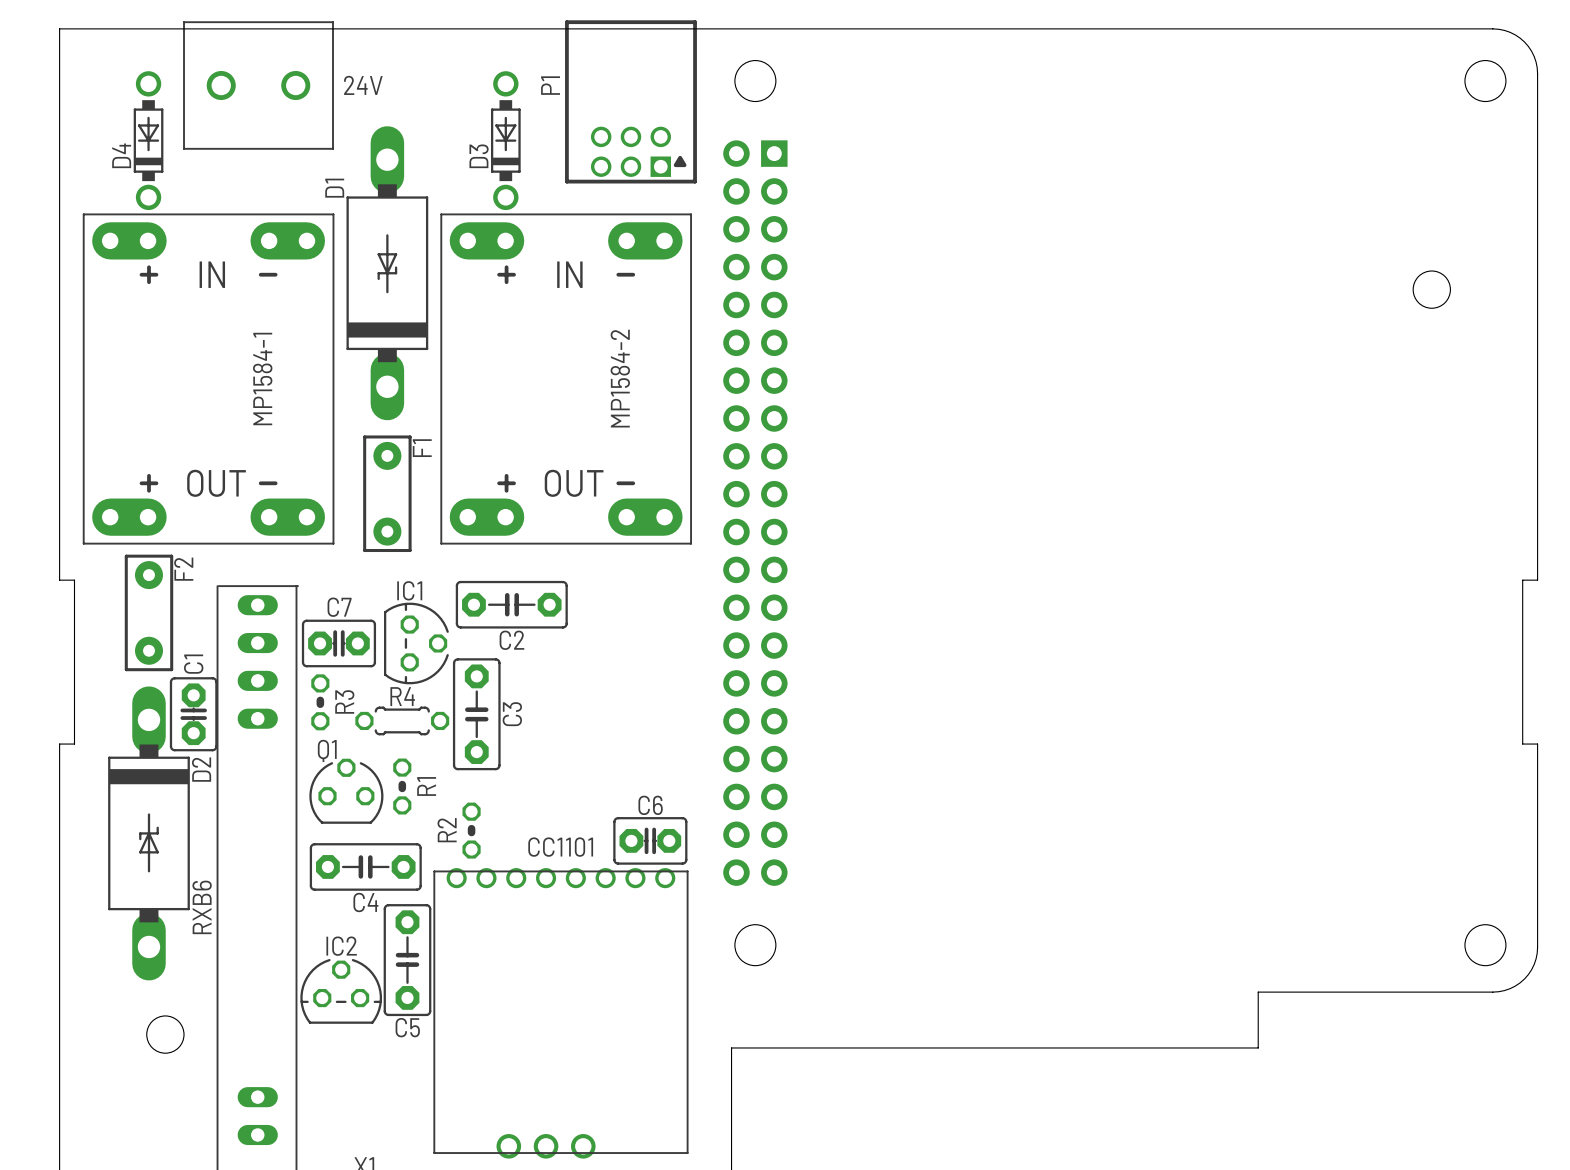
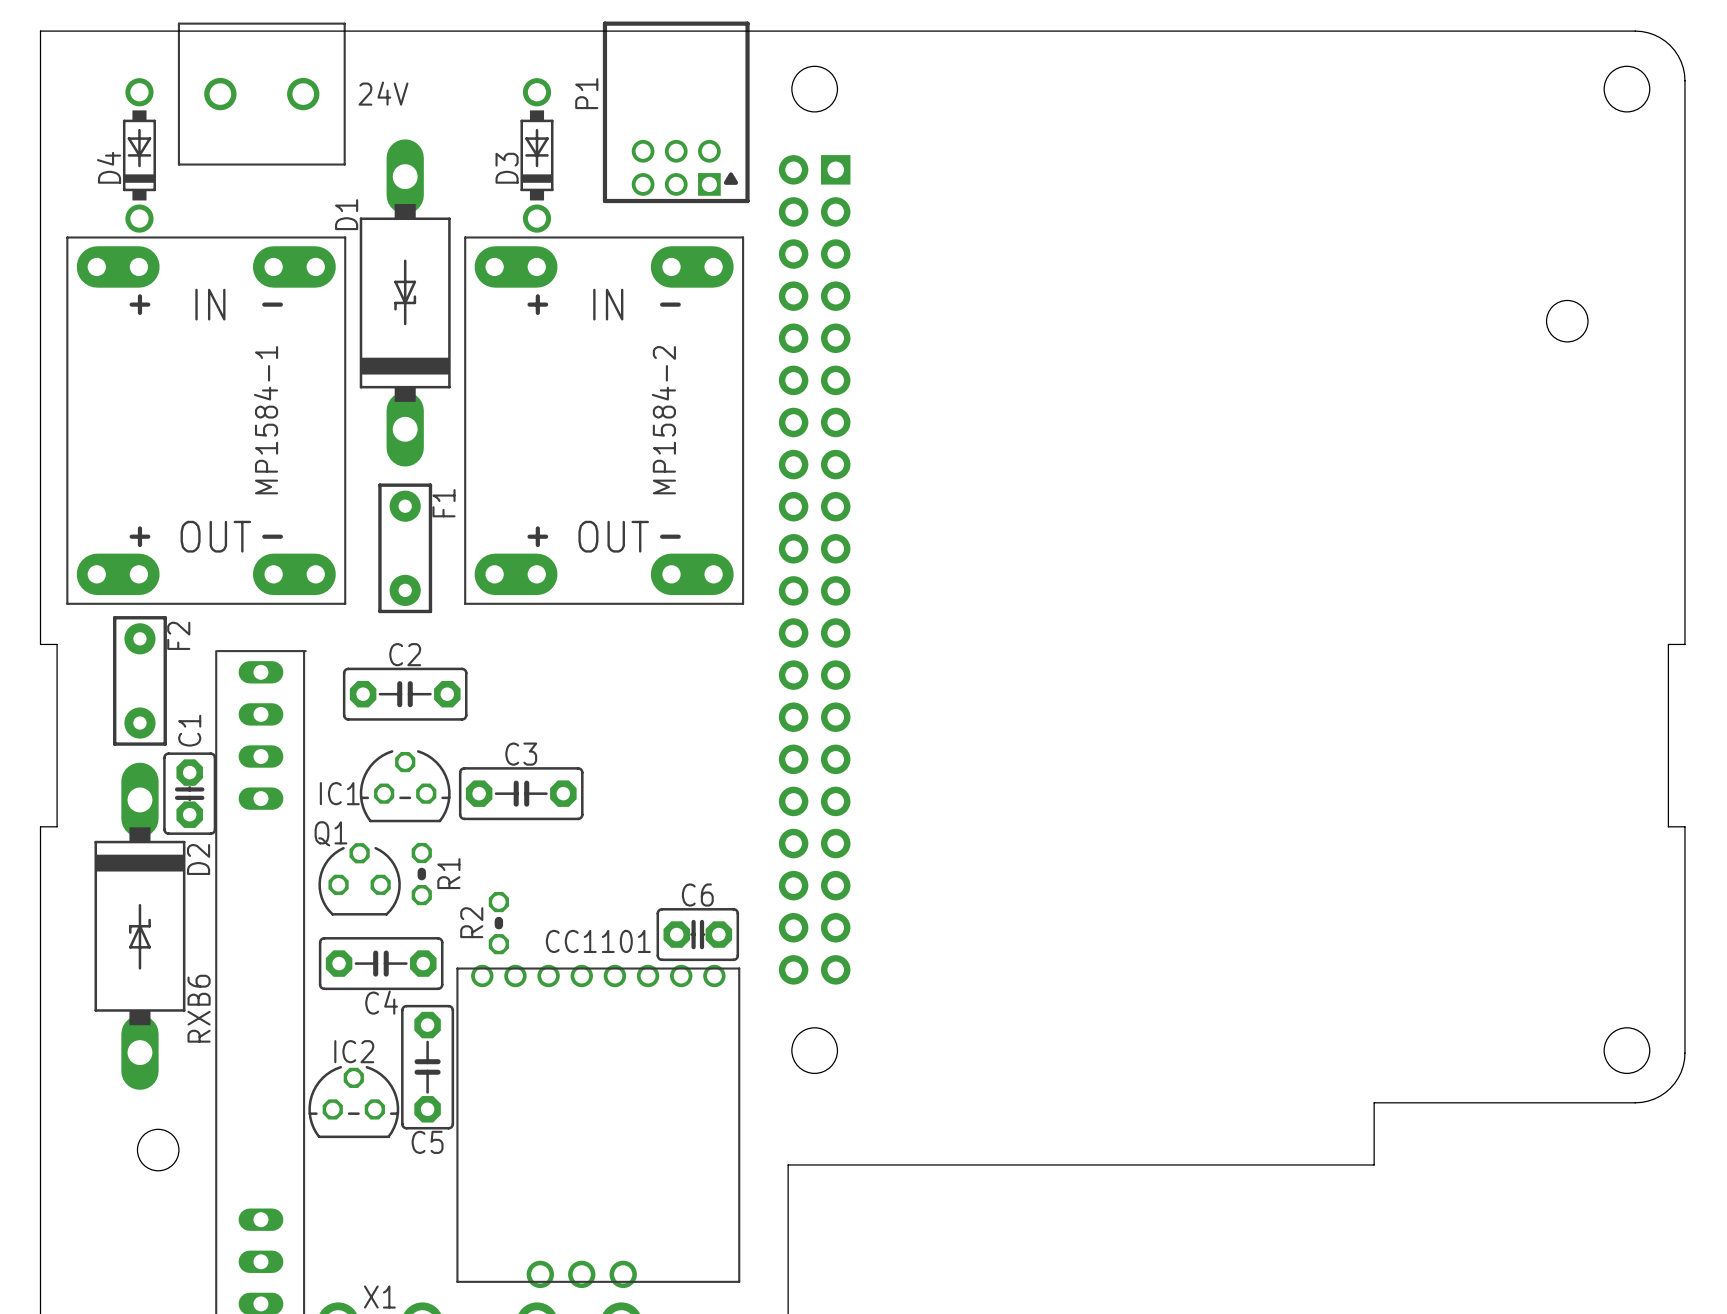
C2 rotation: 0° (511, 604) -> 180° (405, 694)
C2 position: (511, 604) -> (405, 694)
C7: (338, 643) -> none
IC1 rotation: 0° (416, 643) -> 90° counterclockwise (405, 786)
IC1 position: (416, 643) -> (405, 786)
R3: (320, 702) -> none
C3 rotation: 0° (476, 714) -> 90° counterclockwise (521, 793)
R4: (402, 720) -> none

